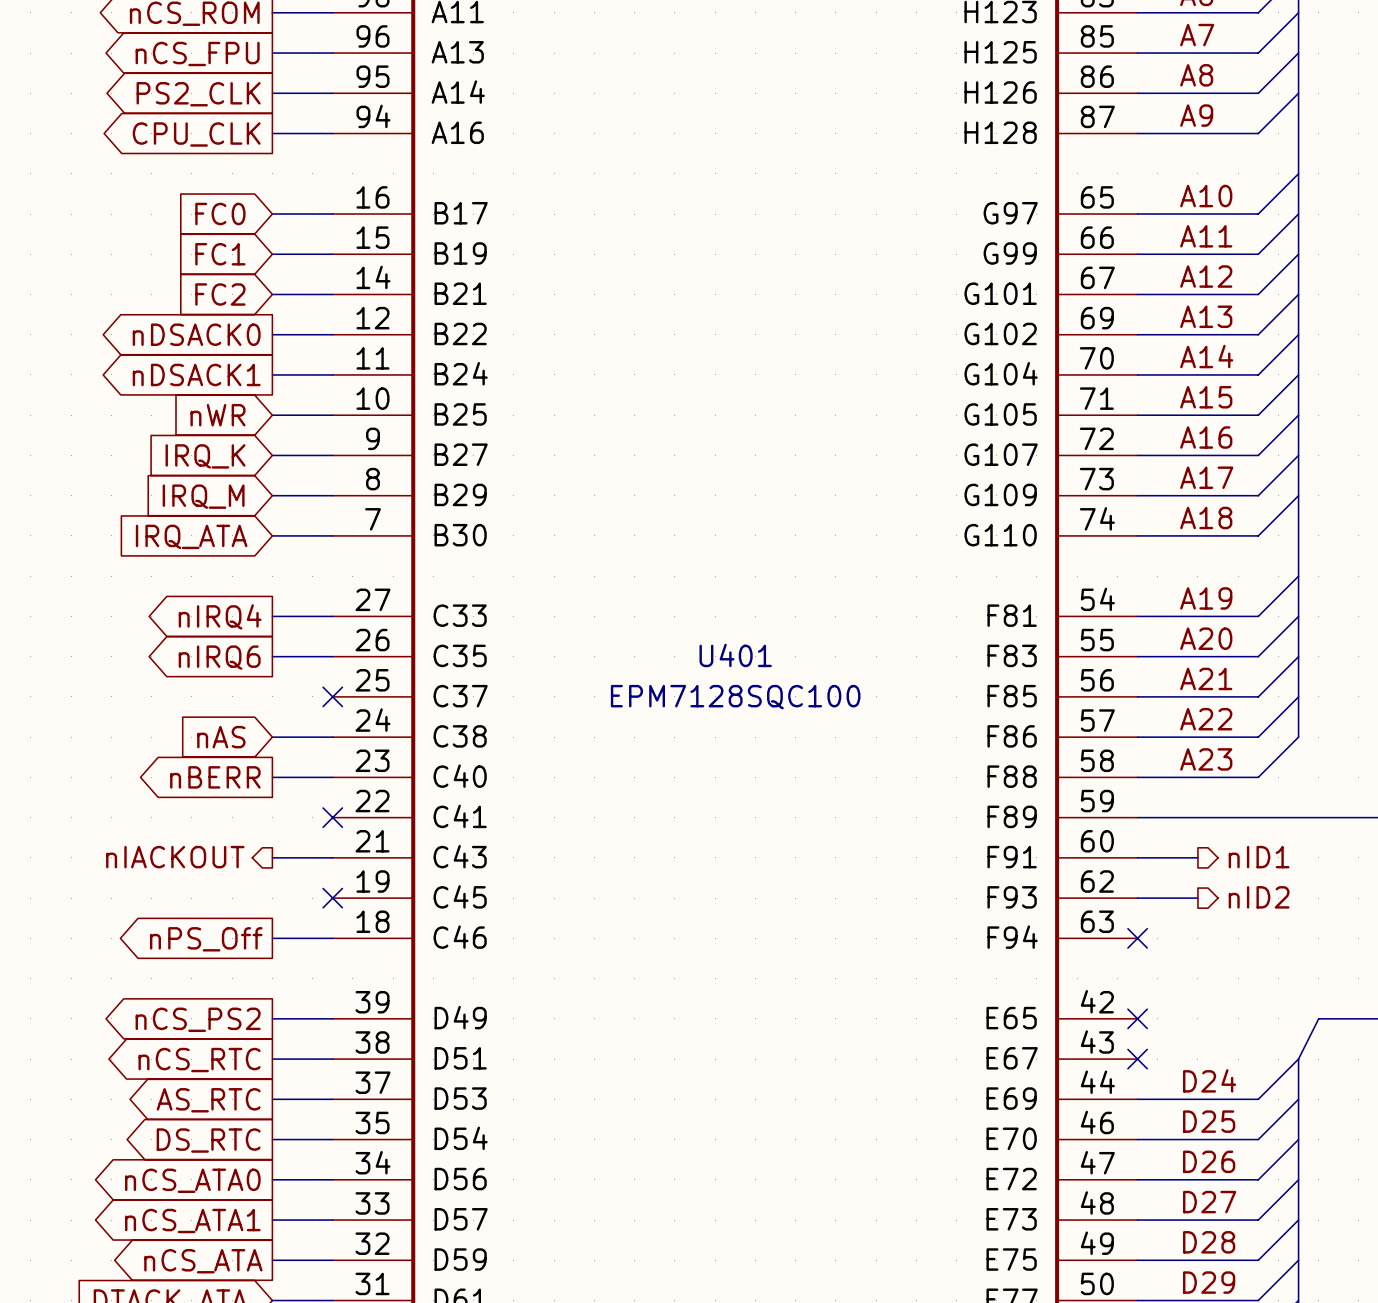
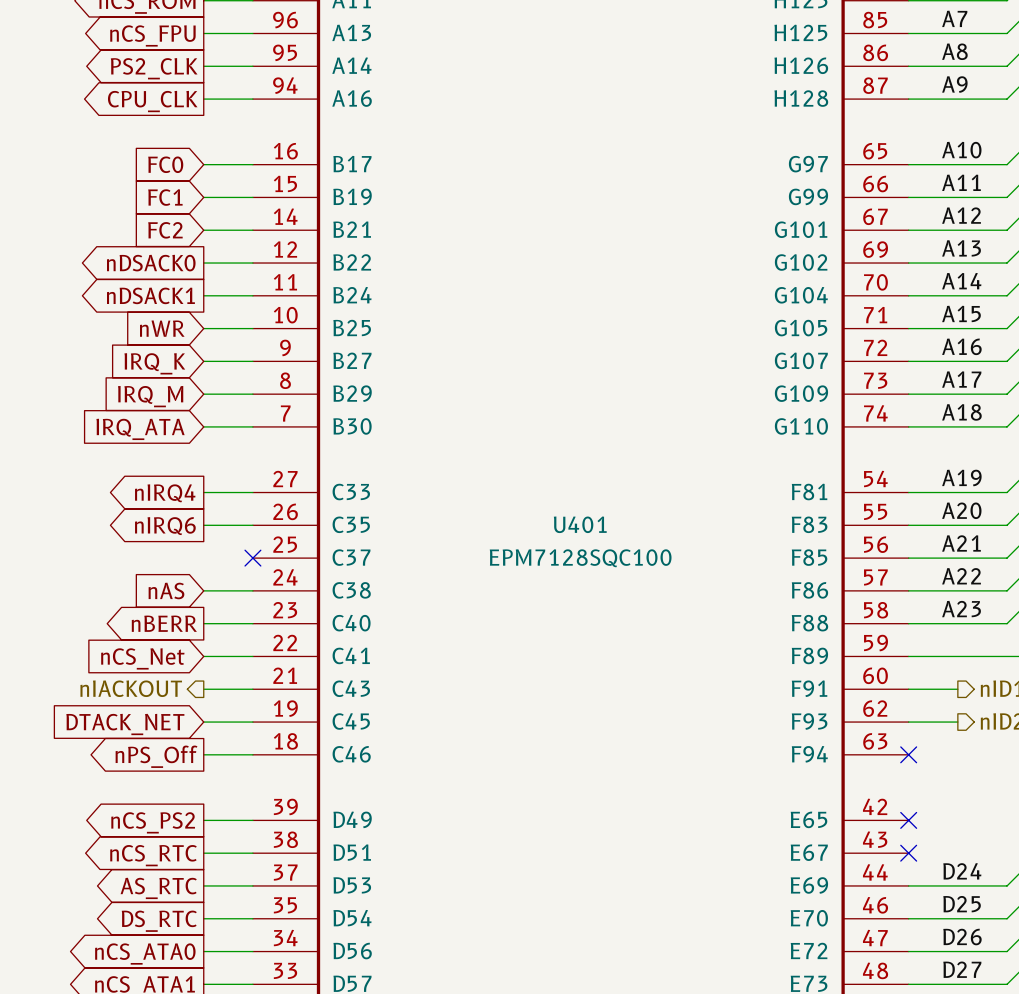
wire: none -> (203, 656) (252, 656)
no-connect mark: (332, 817) -> none
global label: none -> nCS_Net (142, 658)
wire: none -> (203, 722) (252, 722)
no-connect mark: (332, 898) -> none
global label: none -> DTACK_NET (125, 724)

